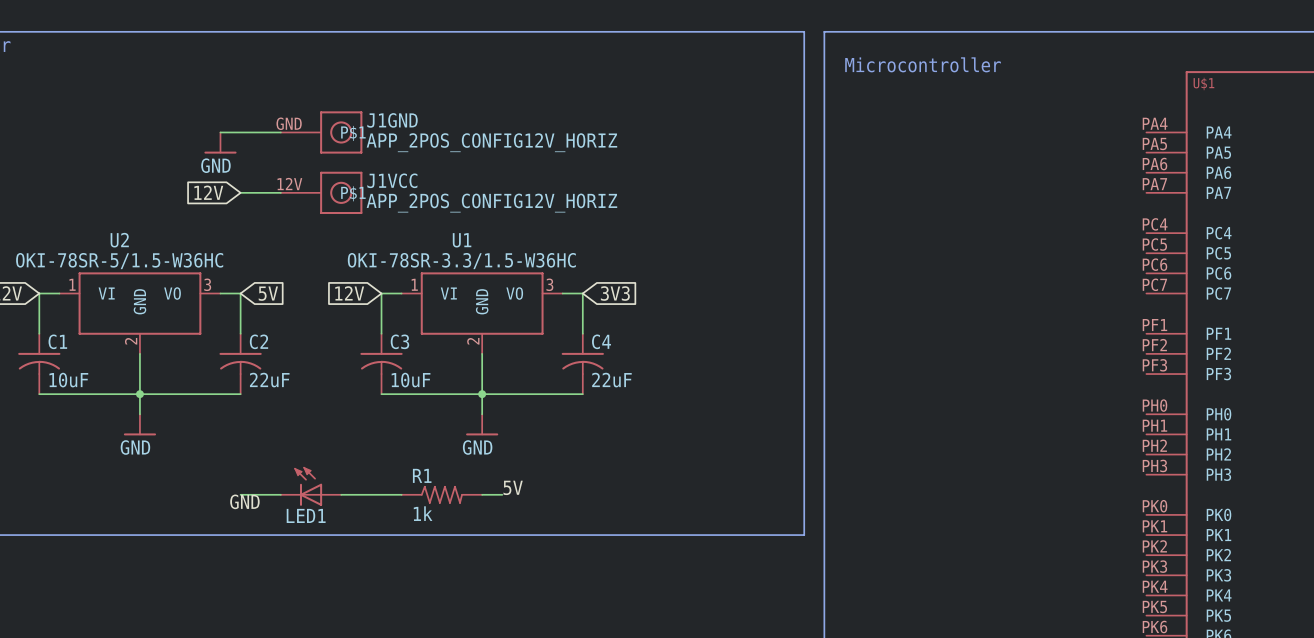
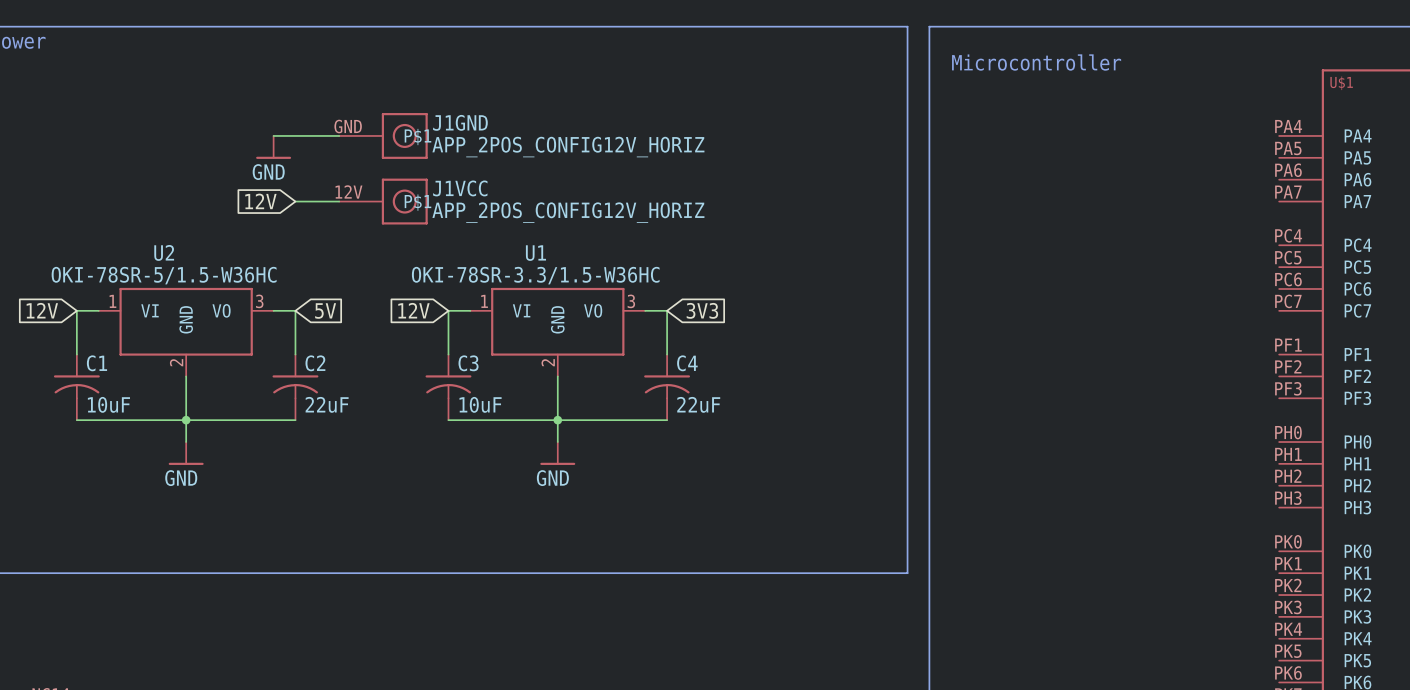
LED1: (311, 486) -> none
label: 5V (513, 487) -> none
wire: (240, 494) (280, 494) -> none
wire: (341, 494) (401, 494) -> none
R1: 1k (441, 494) -> none
wire: (482, 494) (502, 494) -> none
label: GND (244, 501) -> none

